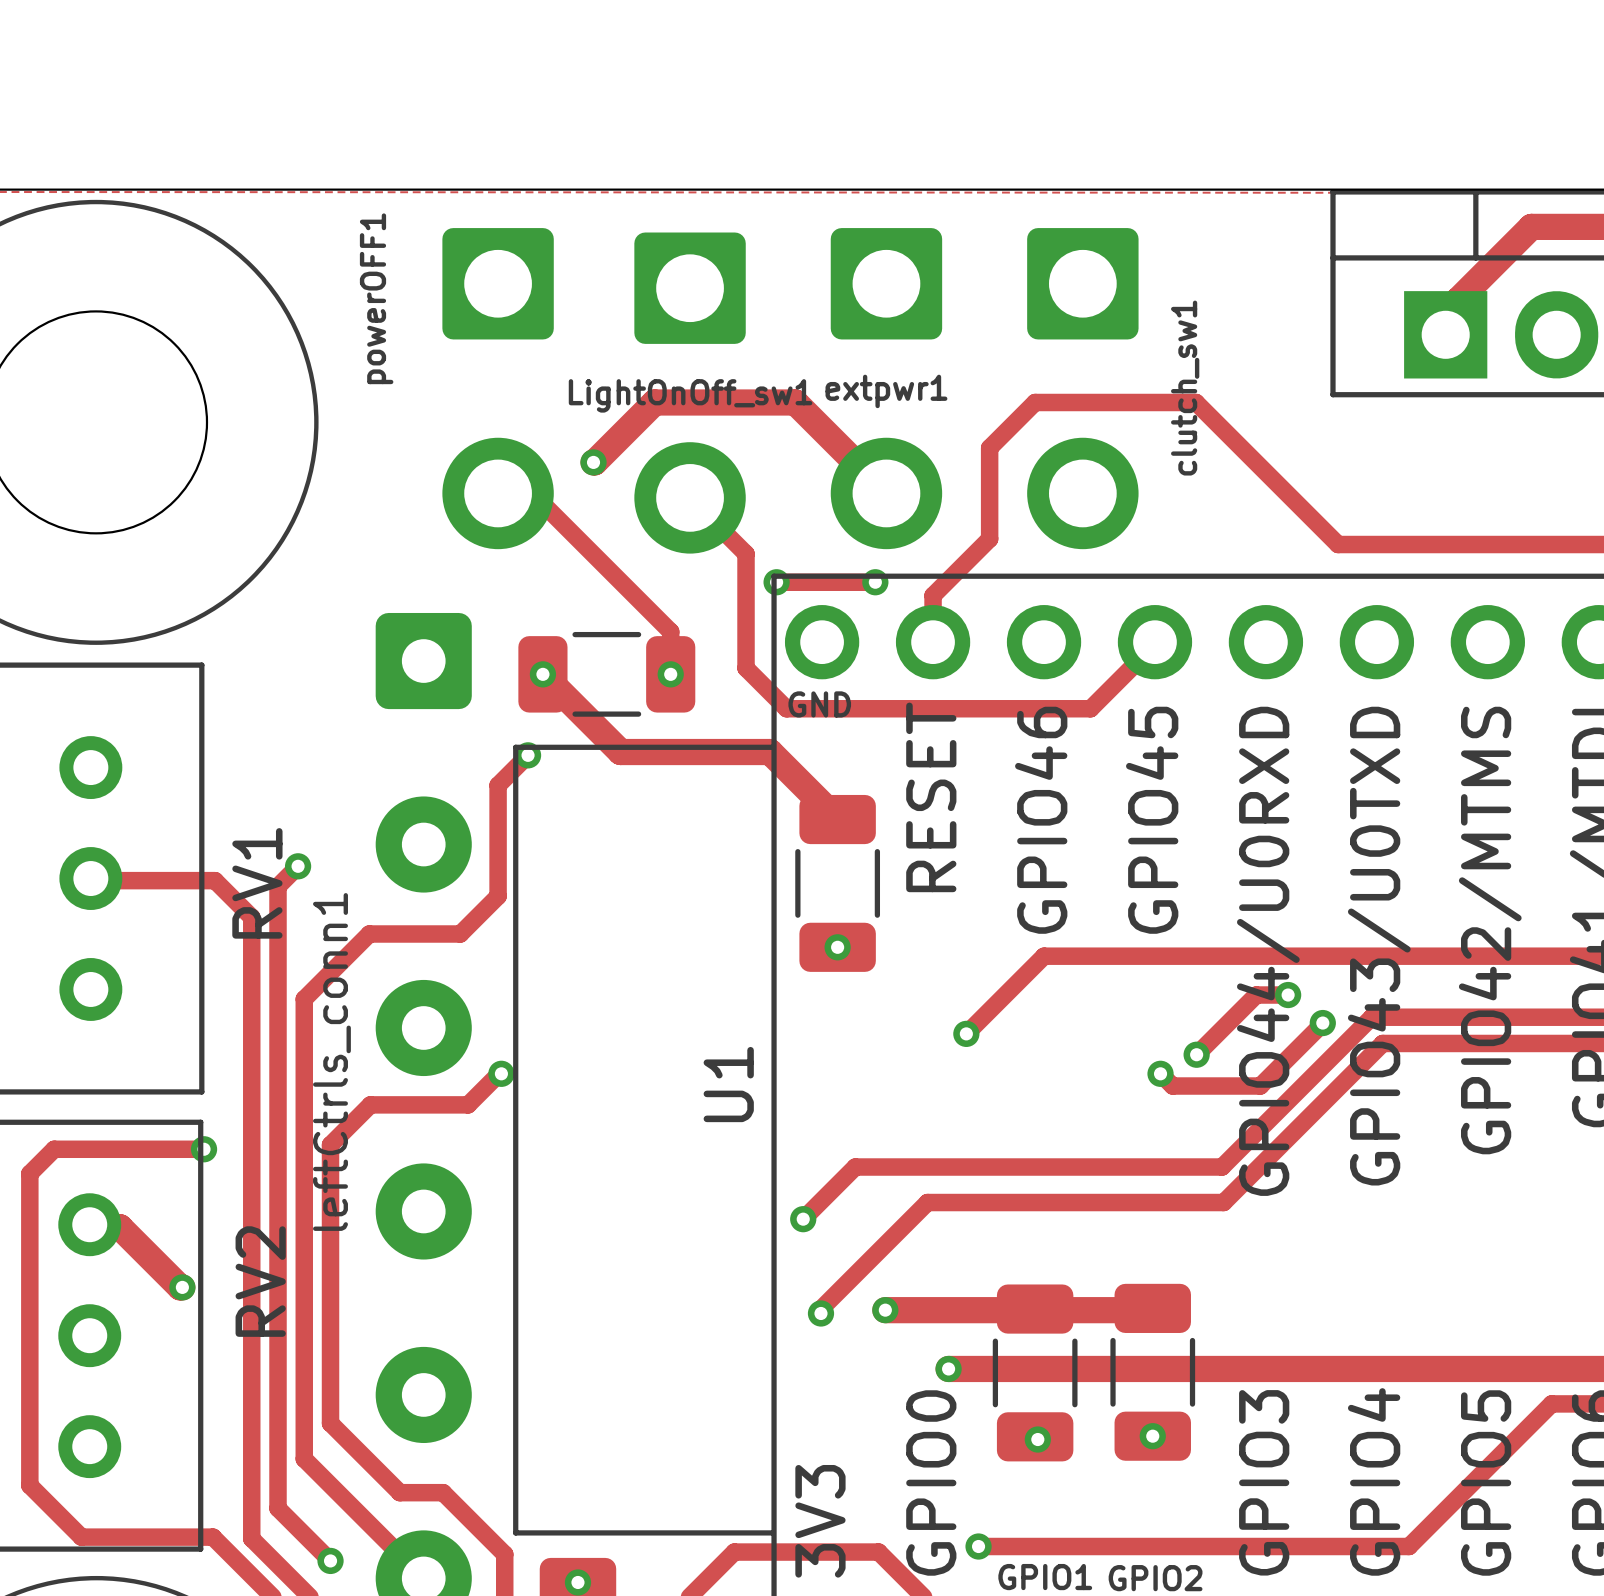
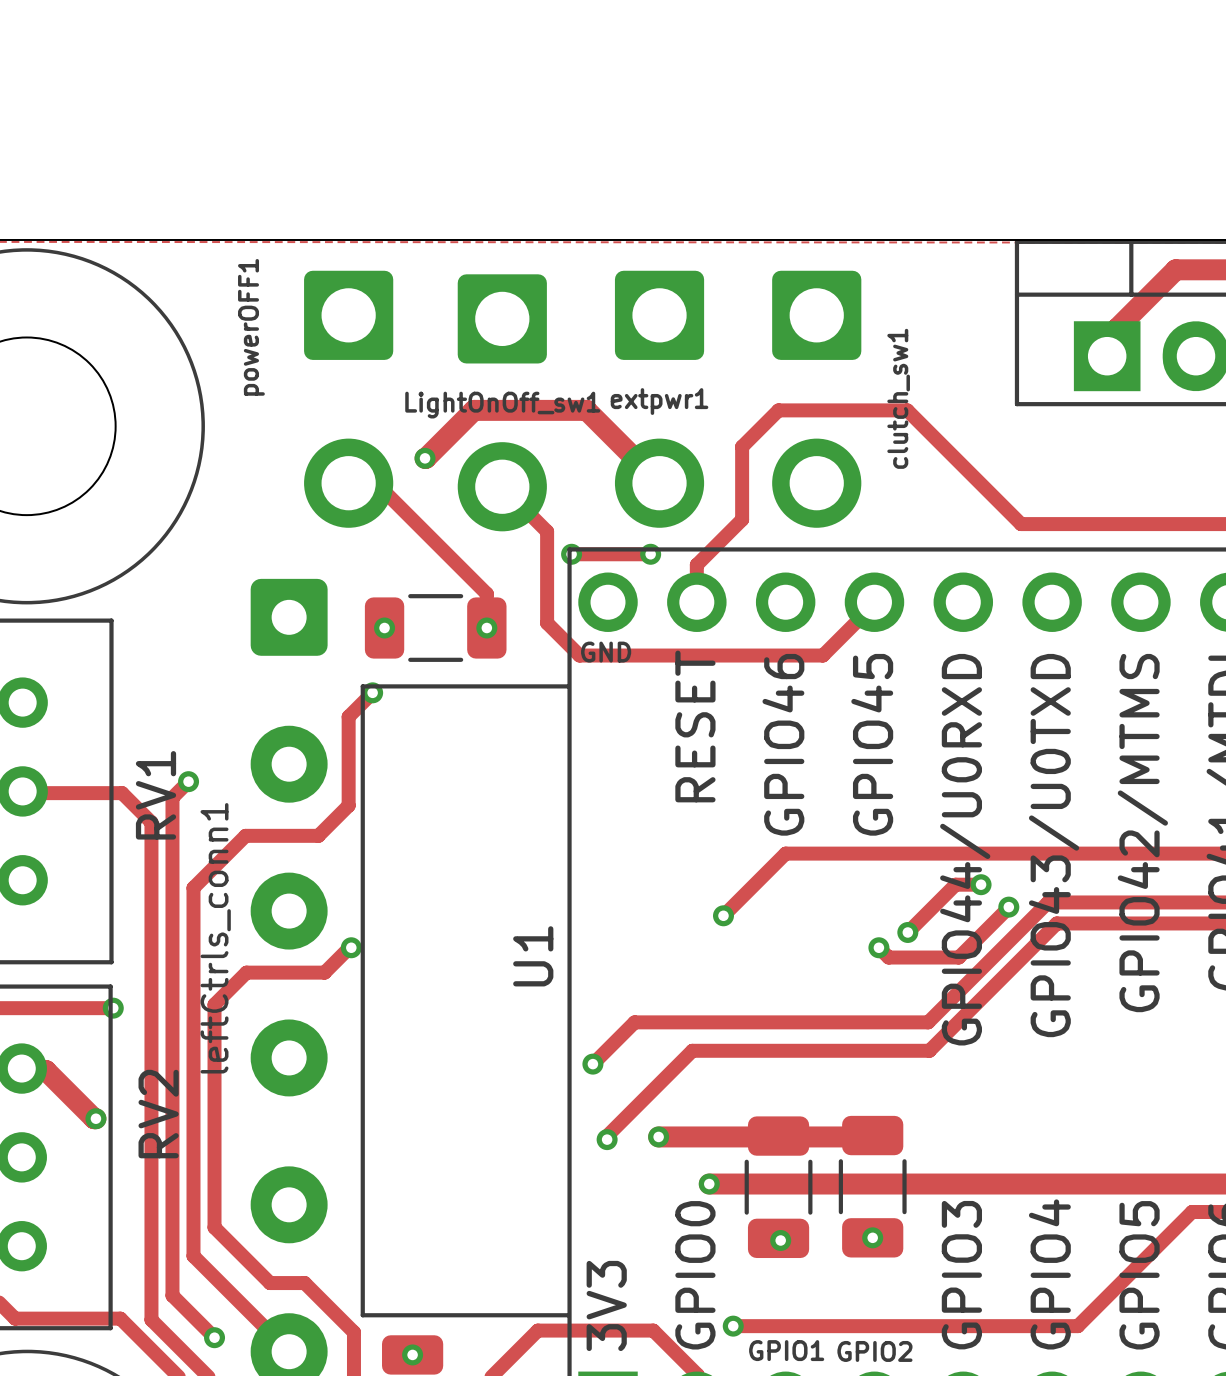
track: (542, 674) (620, 752) (770, 752) (837, 819) -> none
part: (837, 883) -> none
via: (837, 947) -> none

